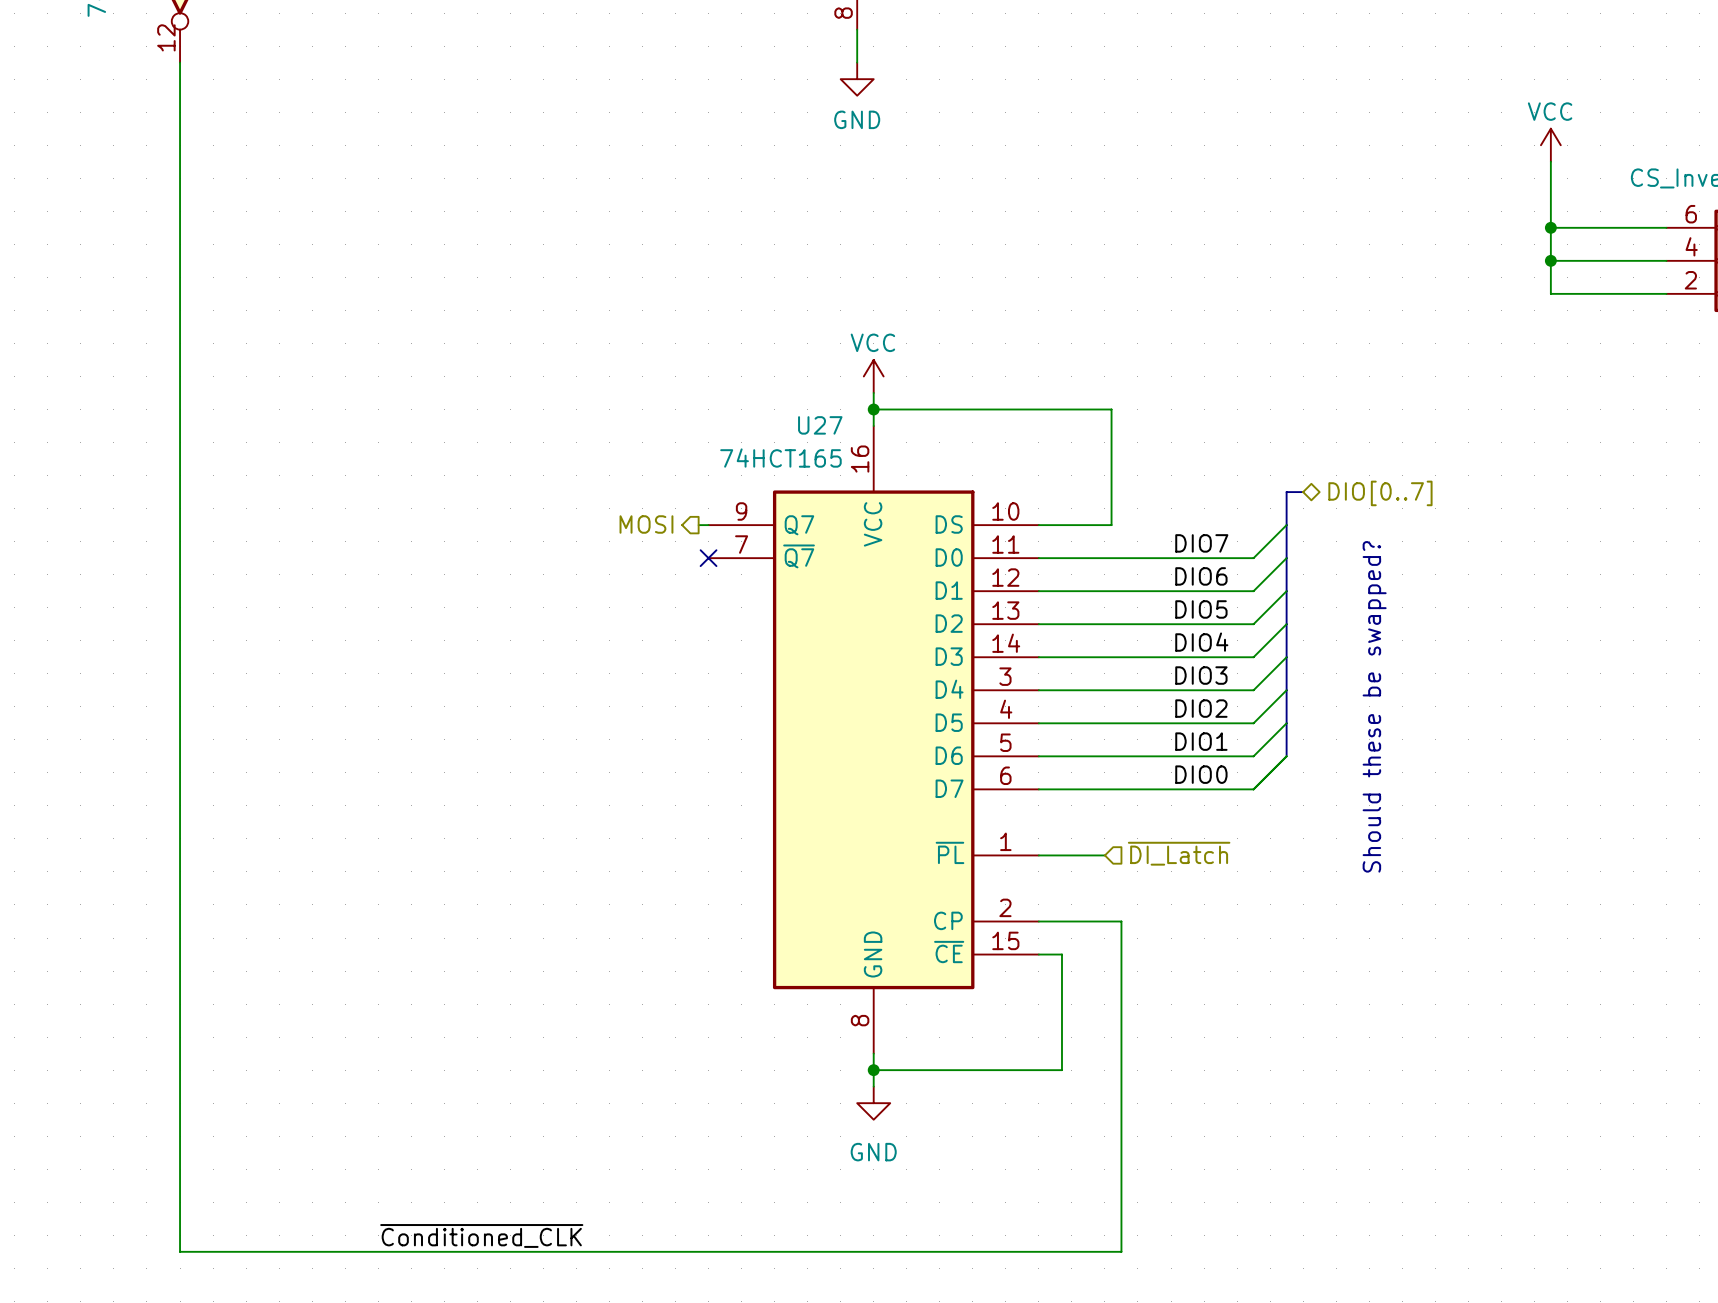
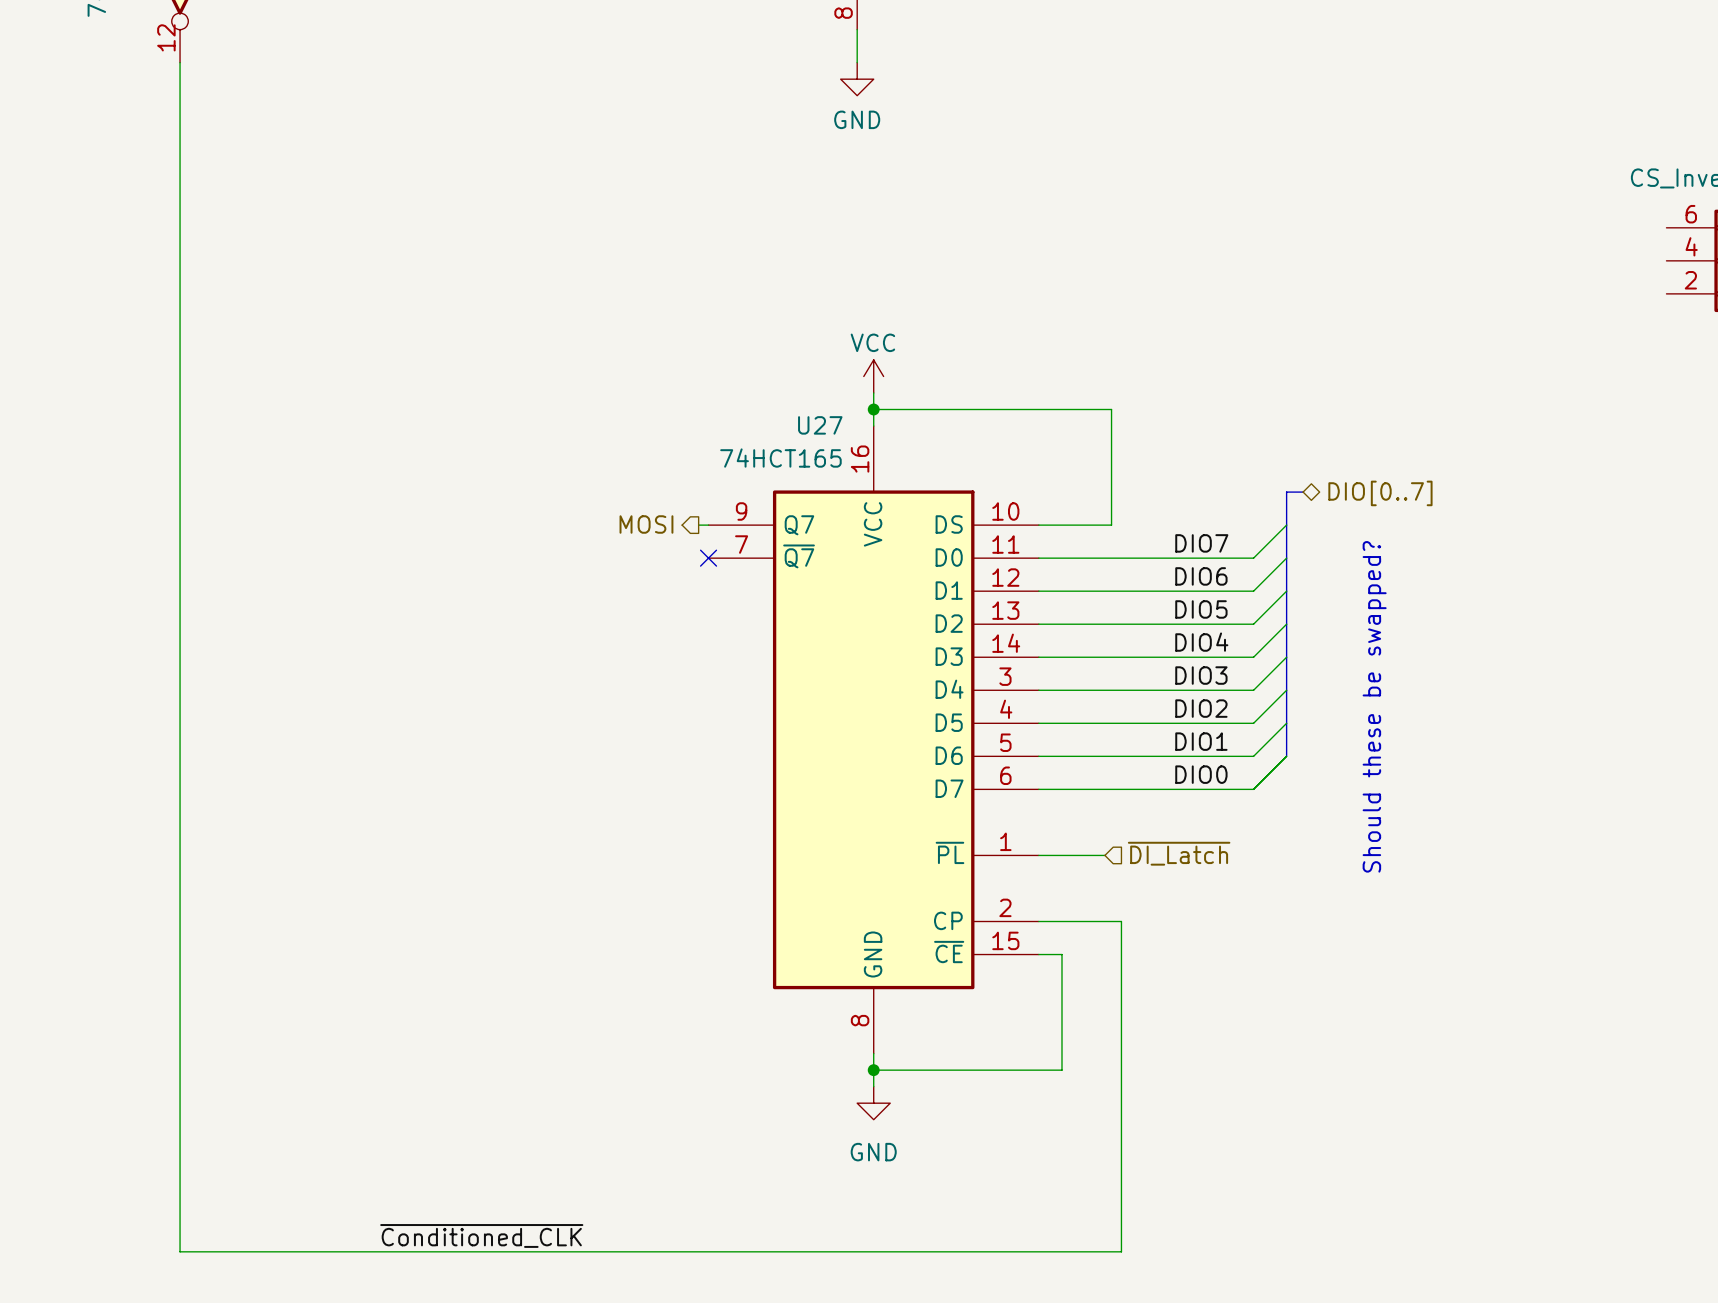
power symbol: VCC (1550, 145) -> none
wire: (1550, 161) (1550, 293) (1666, 293) -> none
wire: (1550, 227) (1666, 227) -> none
junction: (1550, 227) -> none
wire: (1550, 260) (1666, 260) -> none
junction: (1550, 260) -> none

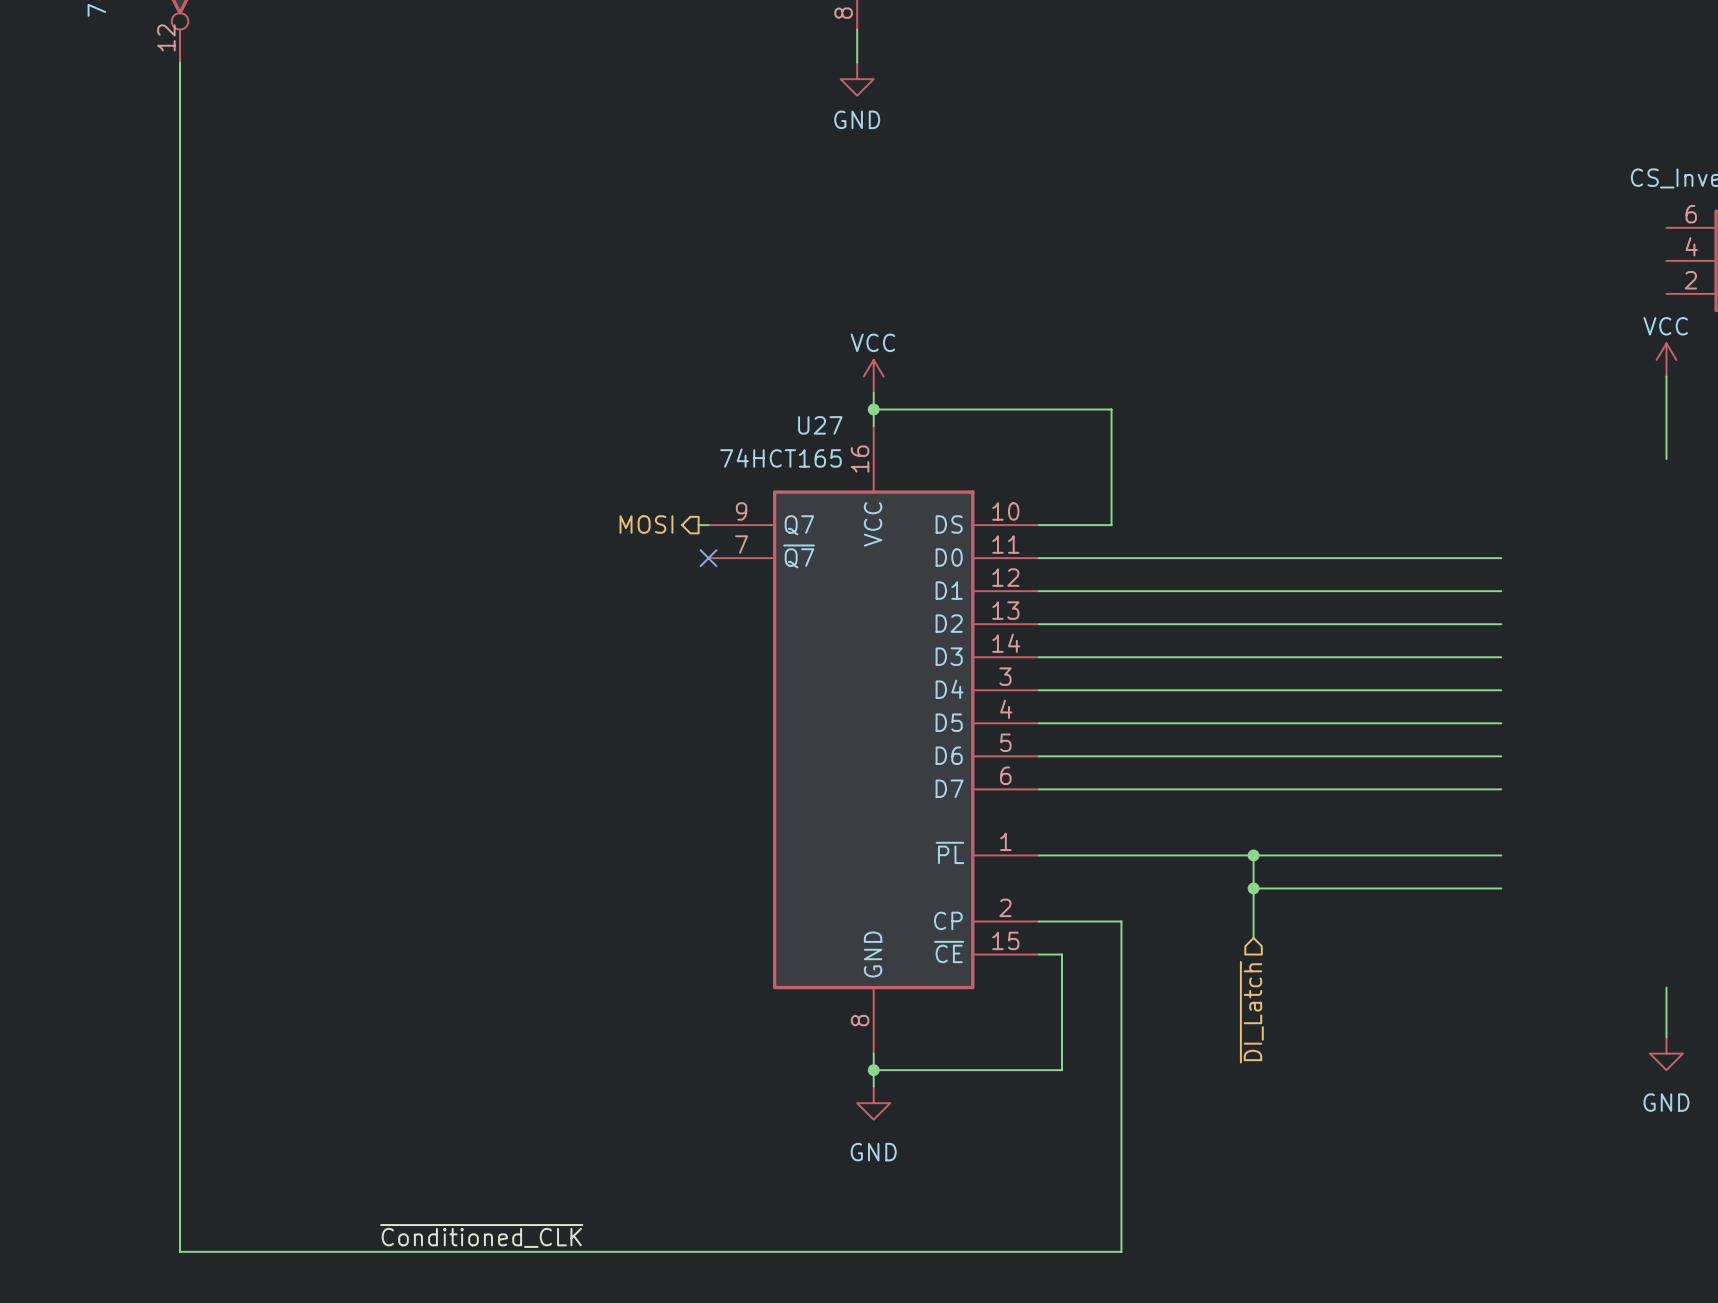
power symbol: none -> VCC (1666, 359)
wire: none -> (1666, 376) (1666, 459)
bus: (1303, 492) (1286, 492) (1286, 756) -> none
hierarchical label: DIO[0..7] (1380, 493) -> none
wire: (1286, 525) (1253, 558) -> (1501, 558) (1253, 558)
label: DIO7 (1201, 543) -> none
wire: (1286, 558) (1253, 591) -> (1501, 591) (1253, 591)
label: DIO6 (1201, 576) -> none
wire: (1286, 591) (1253, 624) -> (1501, 624) (1253, 624)
label: DIO5 (1201, 609) -> none
wire: (1286, 624) (1253, 657) -> (1501, 657) (1253, 657)
label: DIO4 (1201, 642) -> none
wire: (1286, 657) (1253, 690) -> (1501, 690) (1253, 690)
label: DIO3 (1201, 675) -> none
wire: (1286, 690) (1253, 723) -> (1501, 723) (1253, 723)
text: Should these be swapped? (1374, 706) -> none
label: DIO2 (1201, 708) -> none
wire: (1286, 723) (1253, 756) -> (1501, 756) (1253, 756)
label: DIO1 (1201, 741) -> none
wire: (1286, 756) (1253, 789) -> (1501, 789) (1253, 789)
label: DIO0 (1201, 774) -> none
hierarchical label rotation: 0° (1179, 853) -> 90° clockwise (1251, 1012)
hierarchical label position: ~{DI_Latch} (1179, 853) -> ~{DI_Latch} (1251, 1012)
wire: none -> (1104, 855) (1501, 855)
wire: none -> (1253, 855) (1253, 938)
junction: none -> (1253, 855)
wire: none -> (1253, 888) (1501, 888)
junction: none -> (1253, 888)
wire: none -> (1666, 987) (1666, 1037)
power symbol: none -> GND (1666, 1053)

